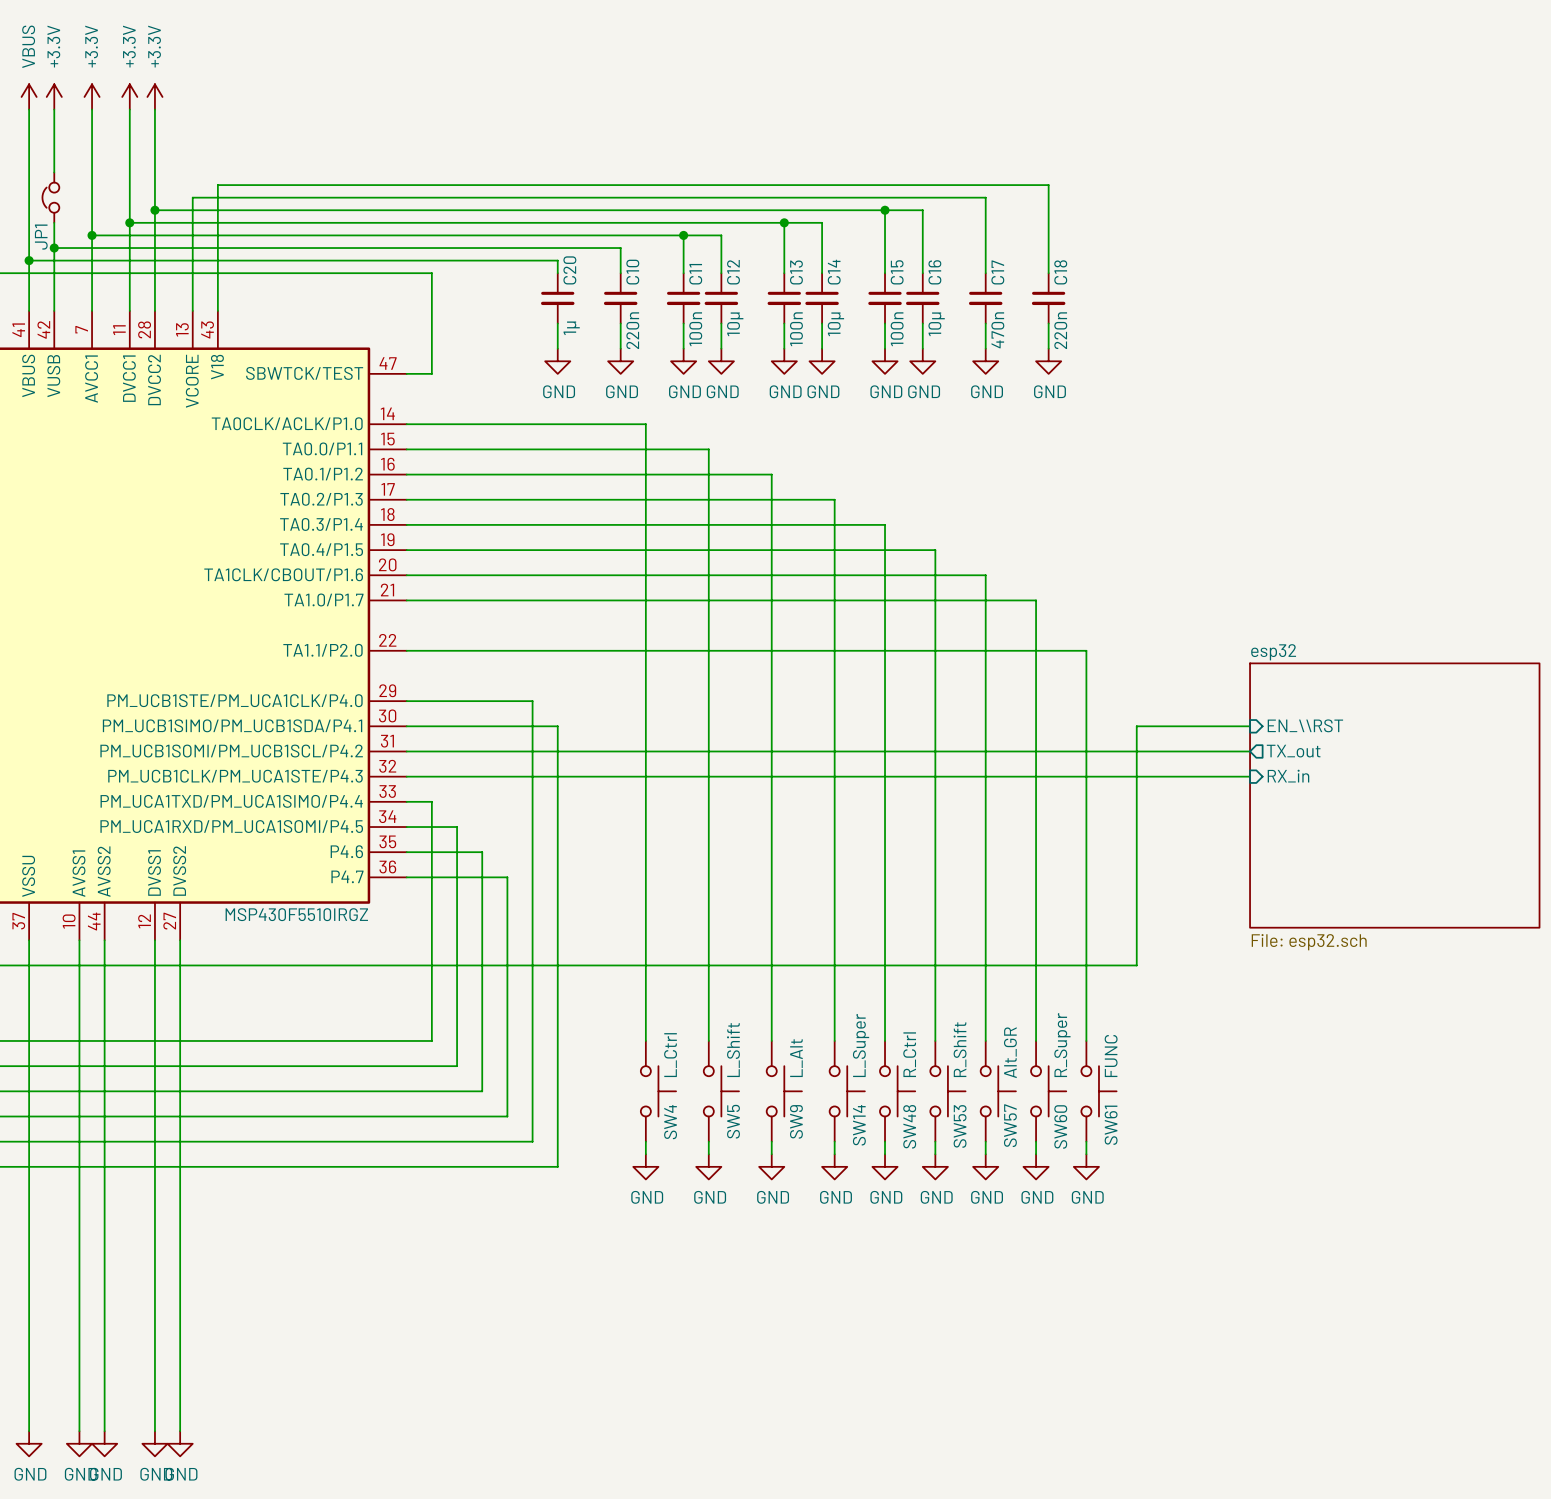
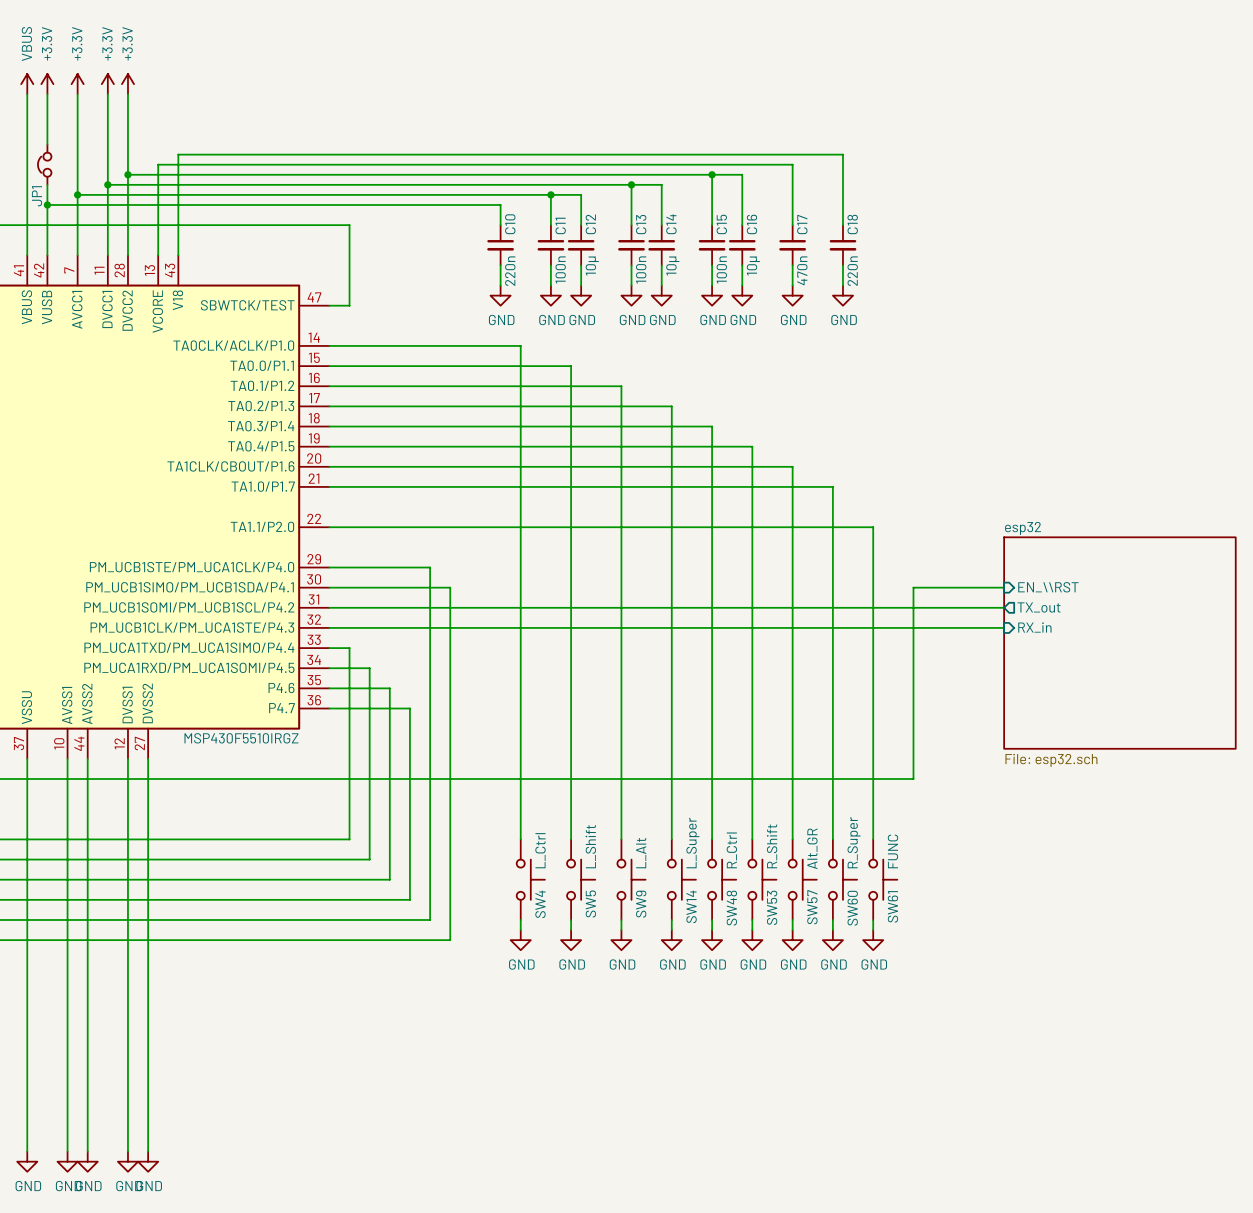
wire: (29, 260) (557, 260) (557, 273) -> none
junction: (29, 260) -> none
C20: 1μ (557, 298) -> none
wire: (557, 323) (557, 348) -> none
power symbol: GND (557, 361) -> none

